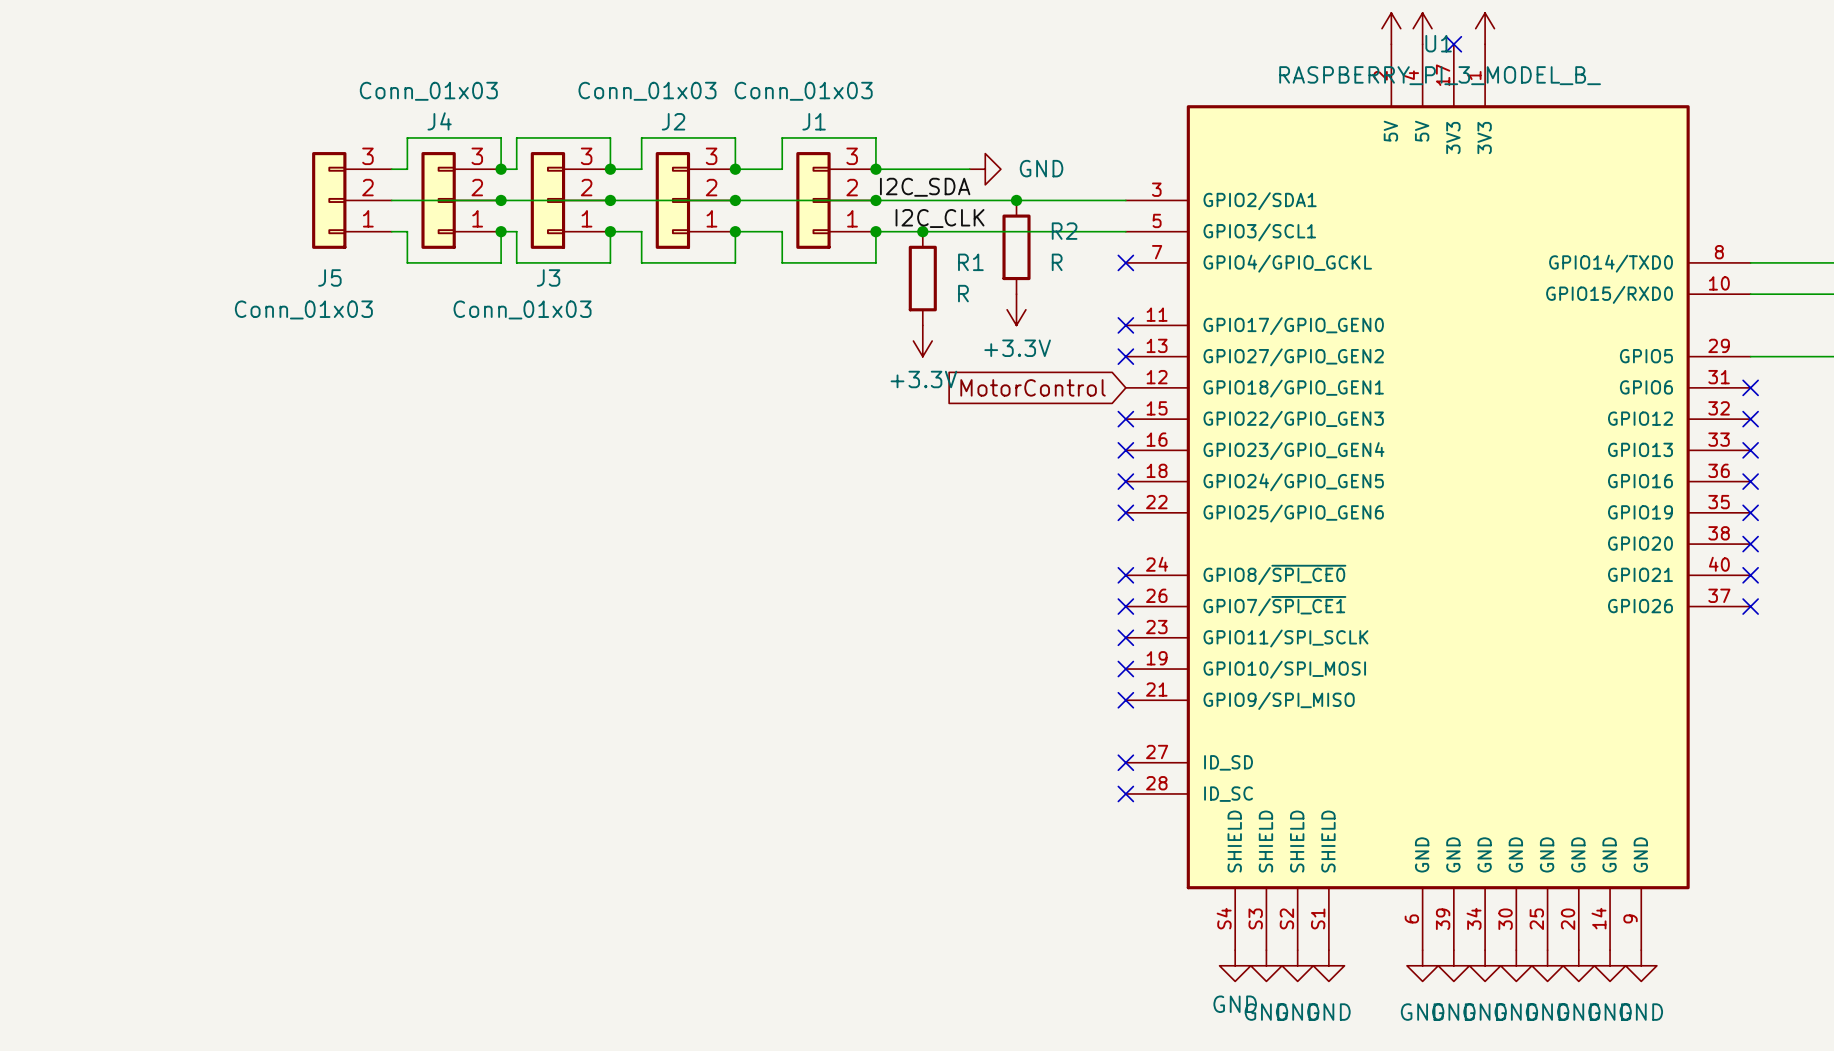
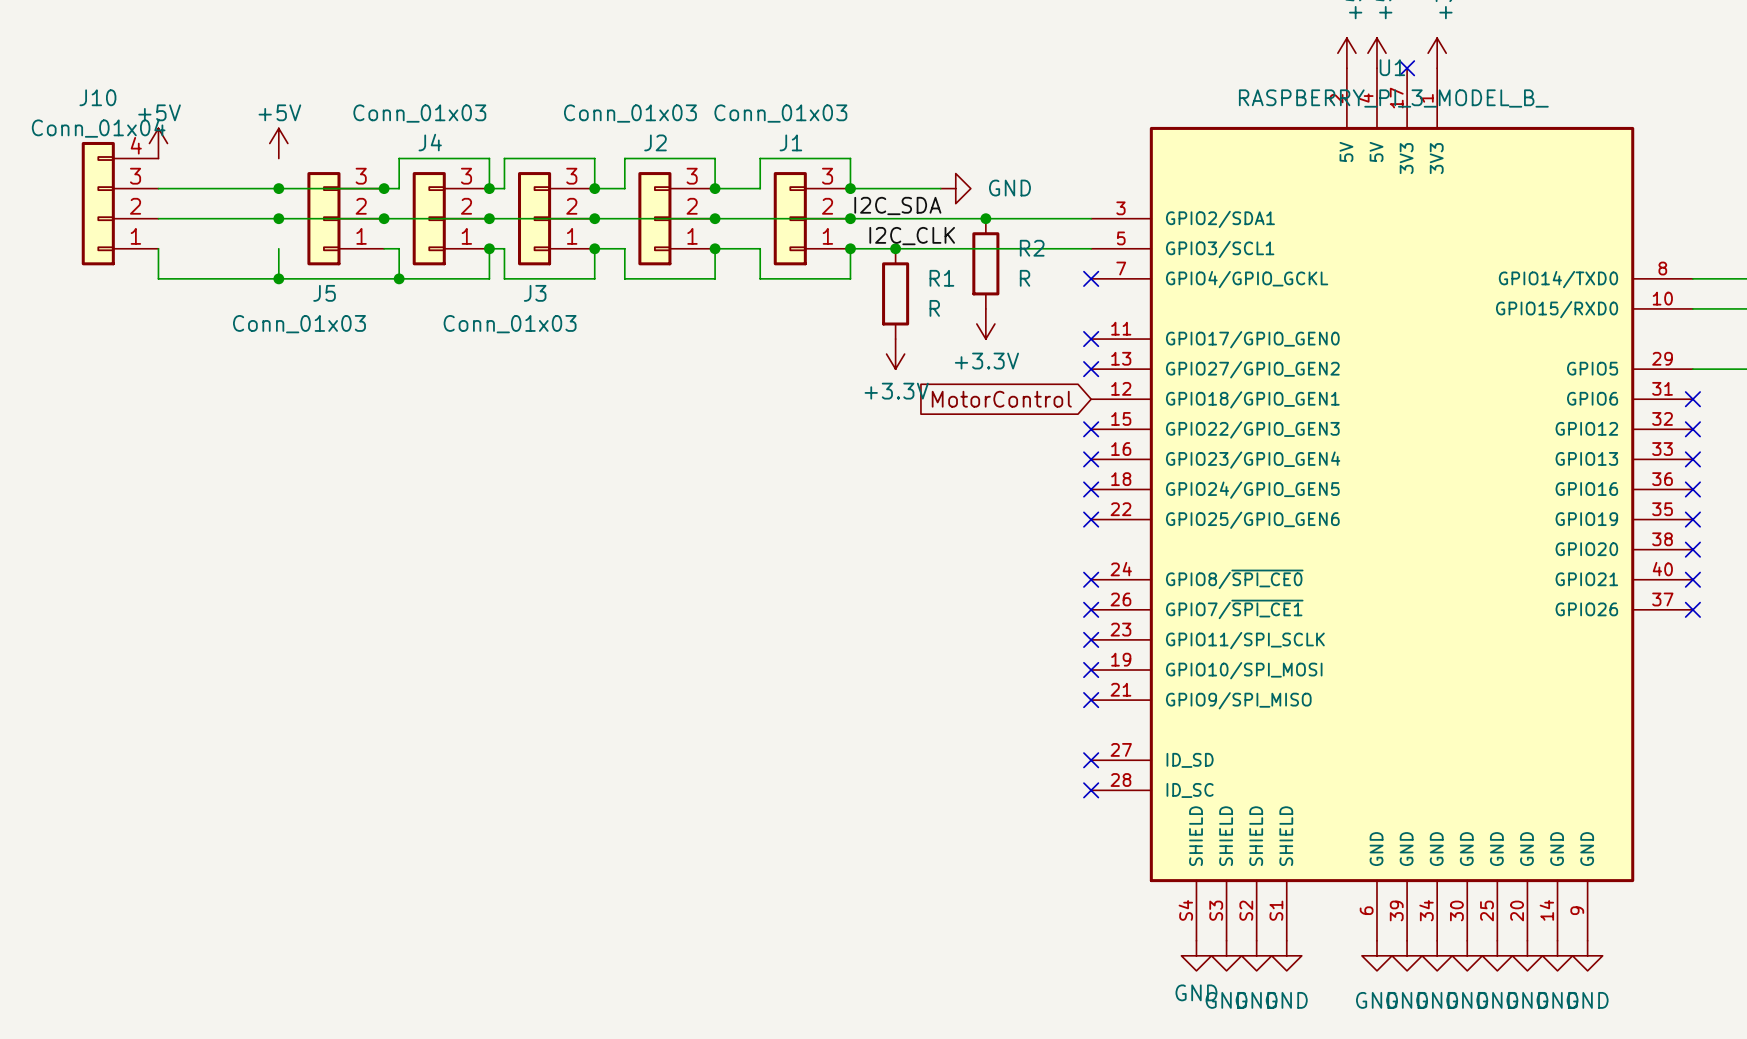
power symbol: none -> +5V (158, 143)
power symbol: none -> +5V (278, 143)
wire: none -> (158, 188) (384, 188)
junction: none -> (278, 188)
junction: none -> (384, 188)
J10: none -> Conn_01x04 (120, 203)
wire: none -> (158, 218) (384, 218)
junction: none -> (278, 218)
junction: none -> (384, 218)
wire: none -> (158, 248) (158, 278) (399, 278)
wire: none -> (278, 248) (278, 278)
junction: none -> (278, 278)
junction: none -> (399, 278)

